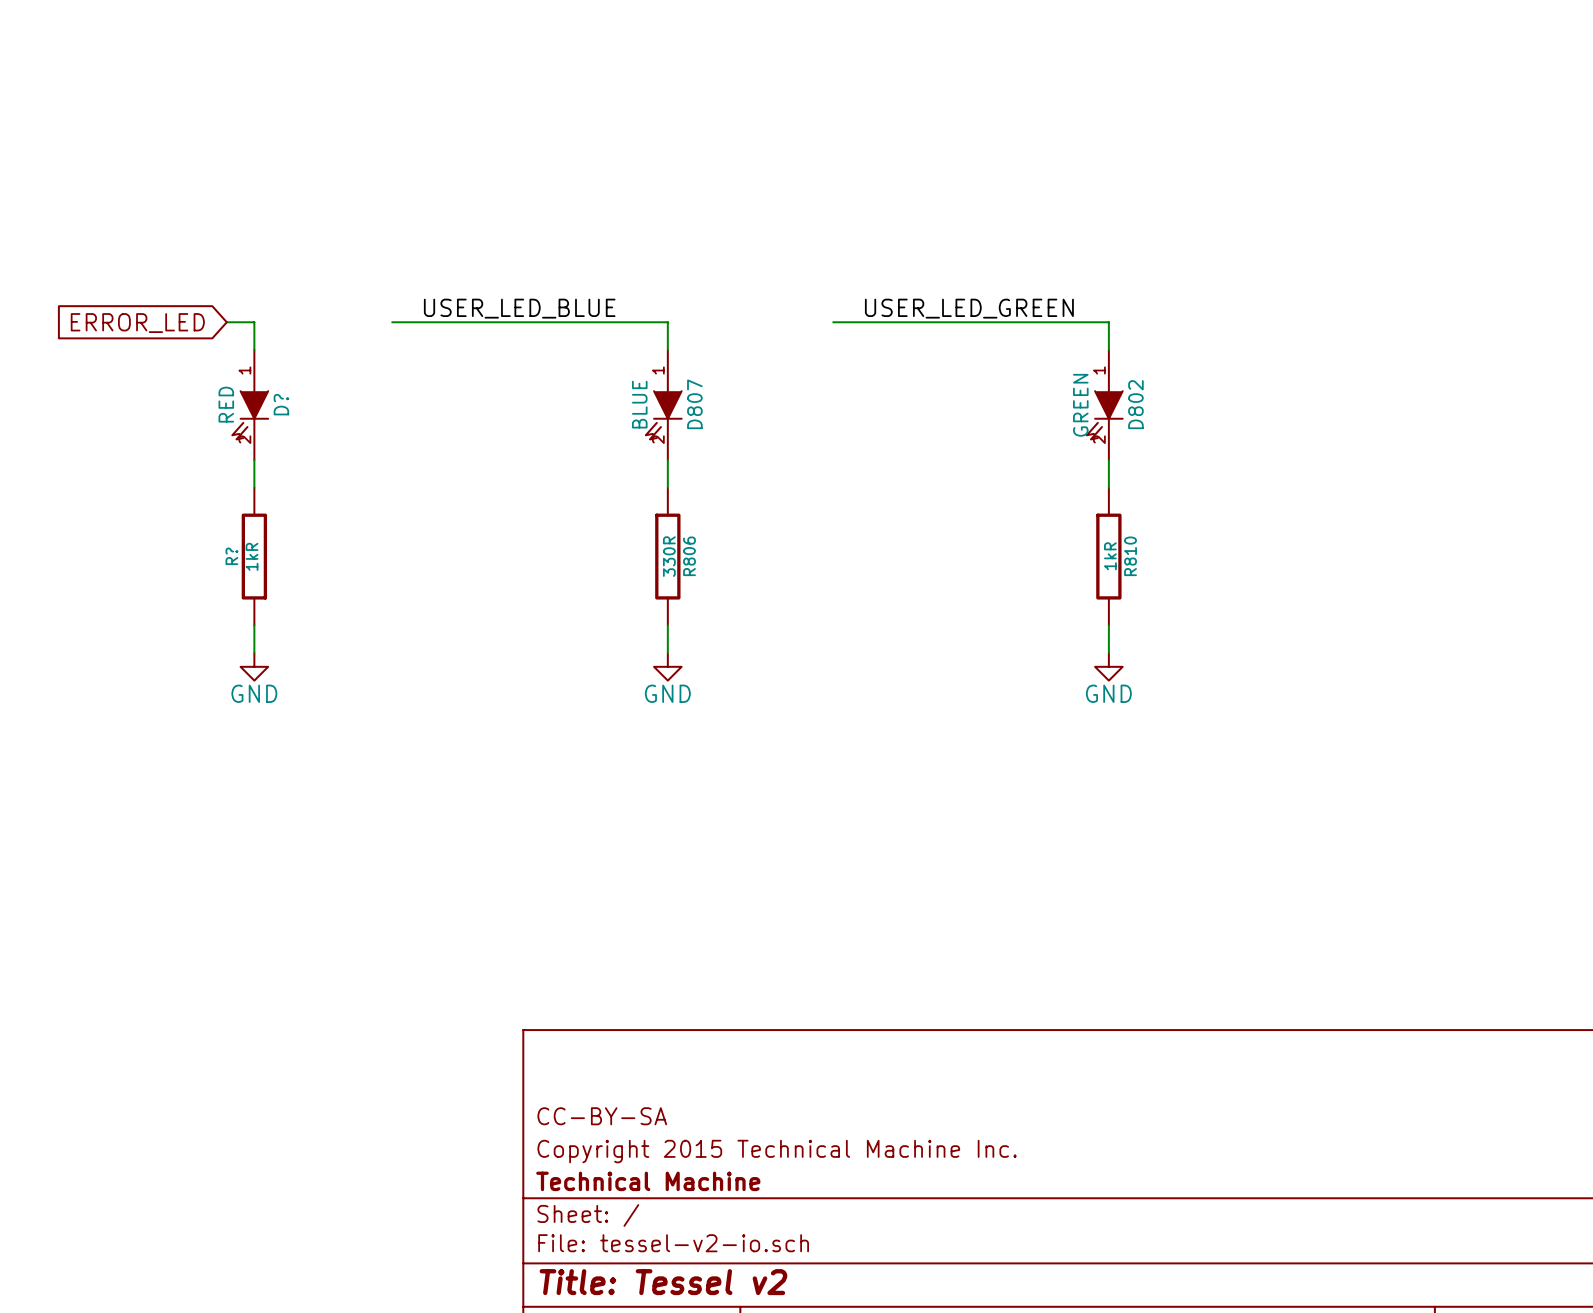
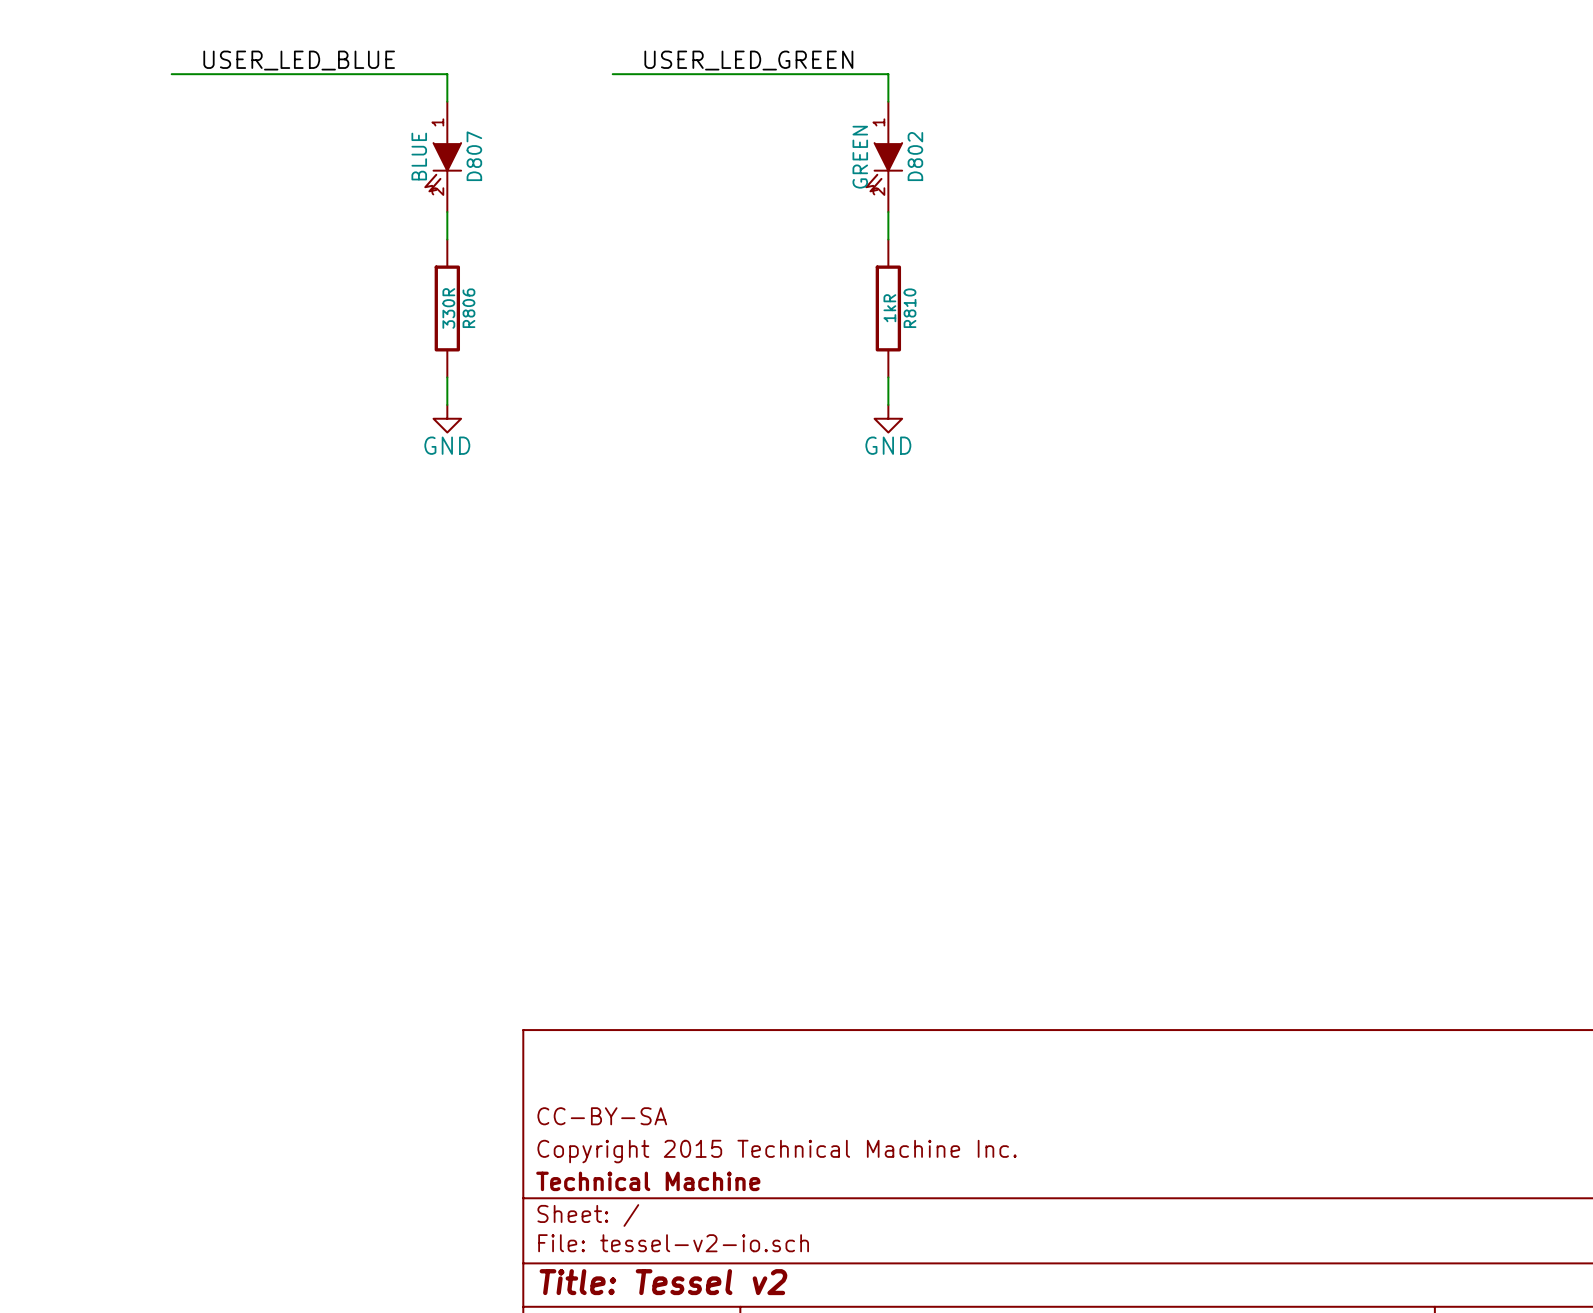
label: none -> USER_LED_BLUE (299, 60)
label: none -> USER_LED_GREEN (748, 60)
wire: none -> (171, 74) (447, 74) (447, 101)
wire: none -> (612, 74) (888, 74) (888, 101)
wire: none -> (447, 212) (447, 239)
wire: none -> (888, 212) (888, 239)
label: USER_LED_BLUE (519, 308) -> none
label: USER_LED_GREEN (969, 308) -> none
wire: (226, 322) (254, 322) (254, 349) -> none
wire: (392, 322) (667, 322) (667, 349) -> none
wire: (833, 322) (1108, 322) (1108, 349) -> none
global label: ERROR_LED (137, 323) -> none
D?: RED (250, 404) -> none
D807 position: (663, 404) -> (443, 156)
D802 position: (1104, 404) -> (884, 156)
power symbol: none -> GND (447, 418)
power symbol: none -> GND (888, 418)
wire: (254, 460) (254, 487) -> none
wire: (667, 460) (667, 487) -> (447, 377) (447, 404)
wire: (1108, 460) (1108, 487) -> (888, 377) (888, 404)
R?: 1kR (254, 556) -> none
R806 position: (667, 556) -> (447, 308)
R810 position: (1108, 556) -> (888, 308)
wire: (254, 625) (254, 653) -> none
wire: (667, 625) (667, 653) -> none
wire: (1108, 625) (1108, 653) -> none
power symbol: GND (254, 666) -> none
power symbol: GND (667, 666) -> none
power symbol: GND (1108, 666) -> none

